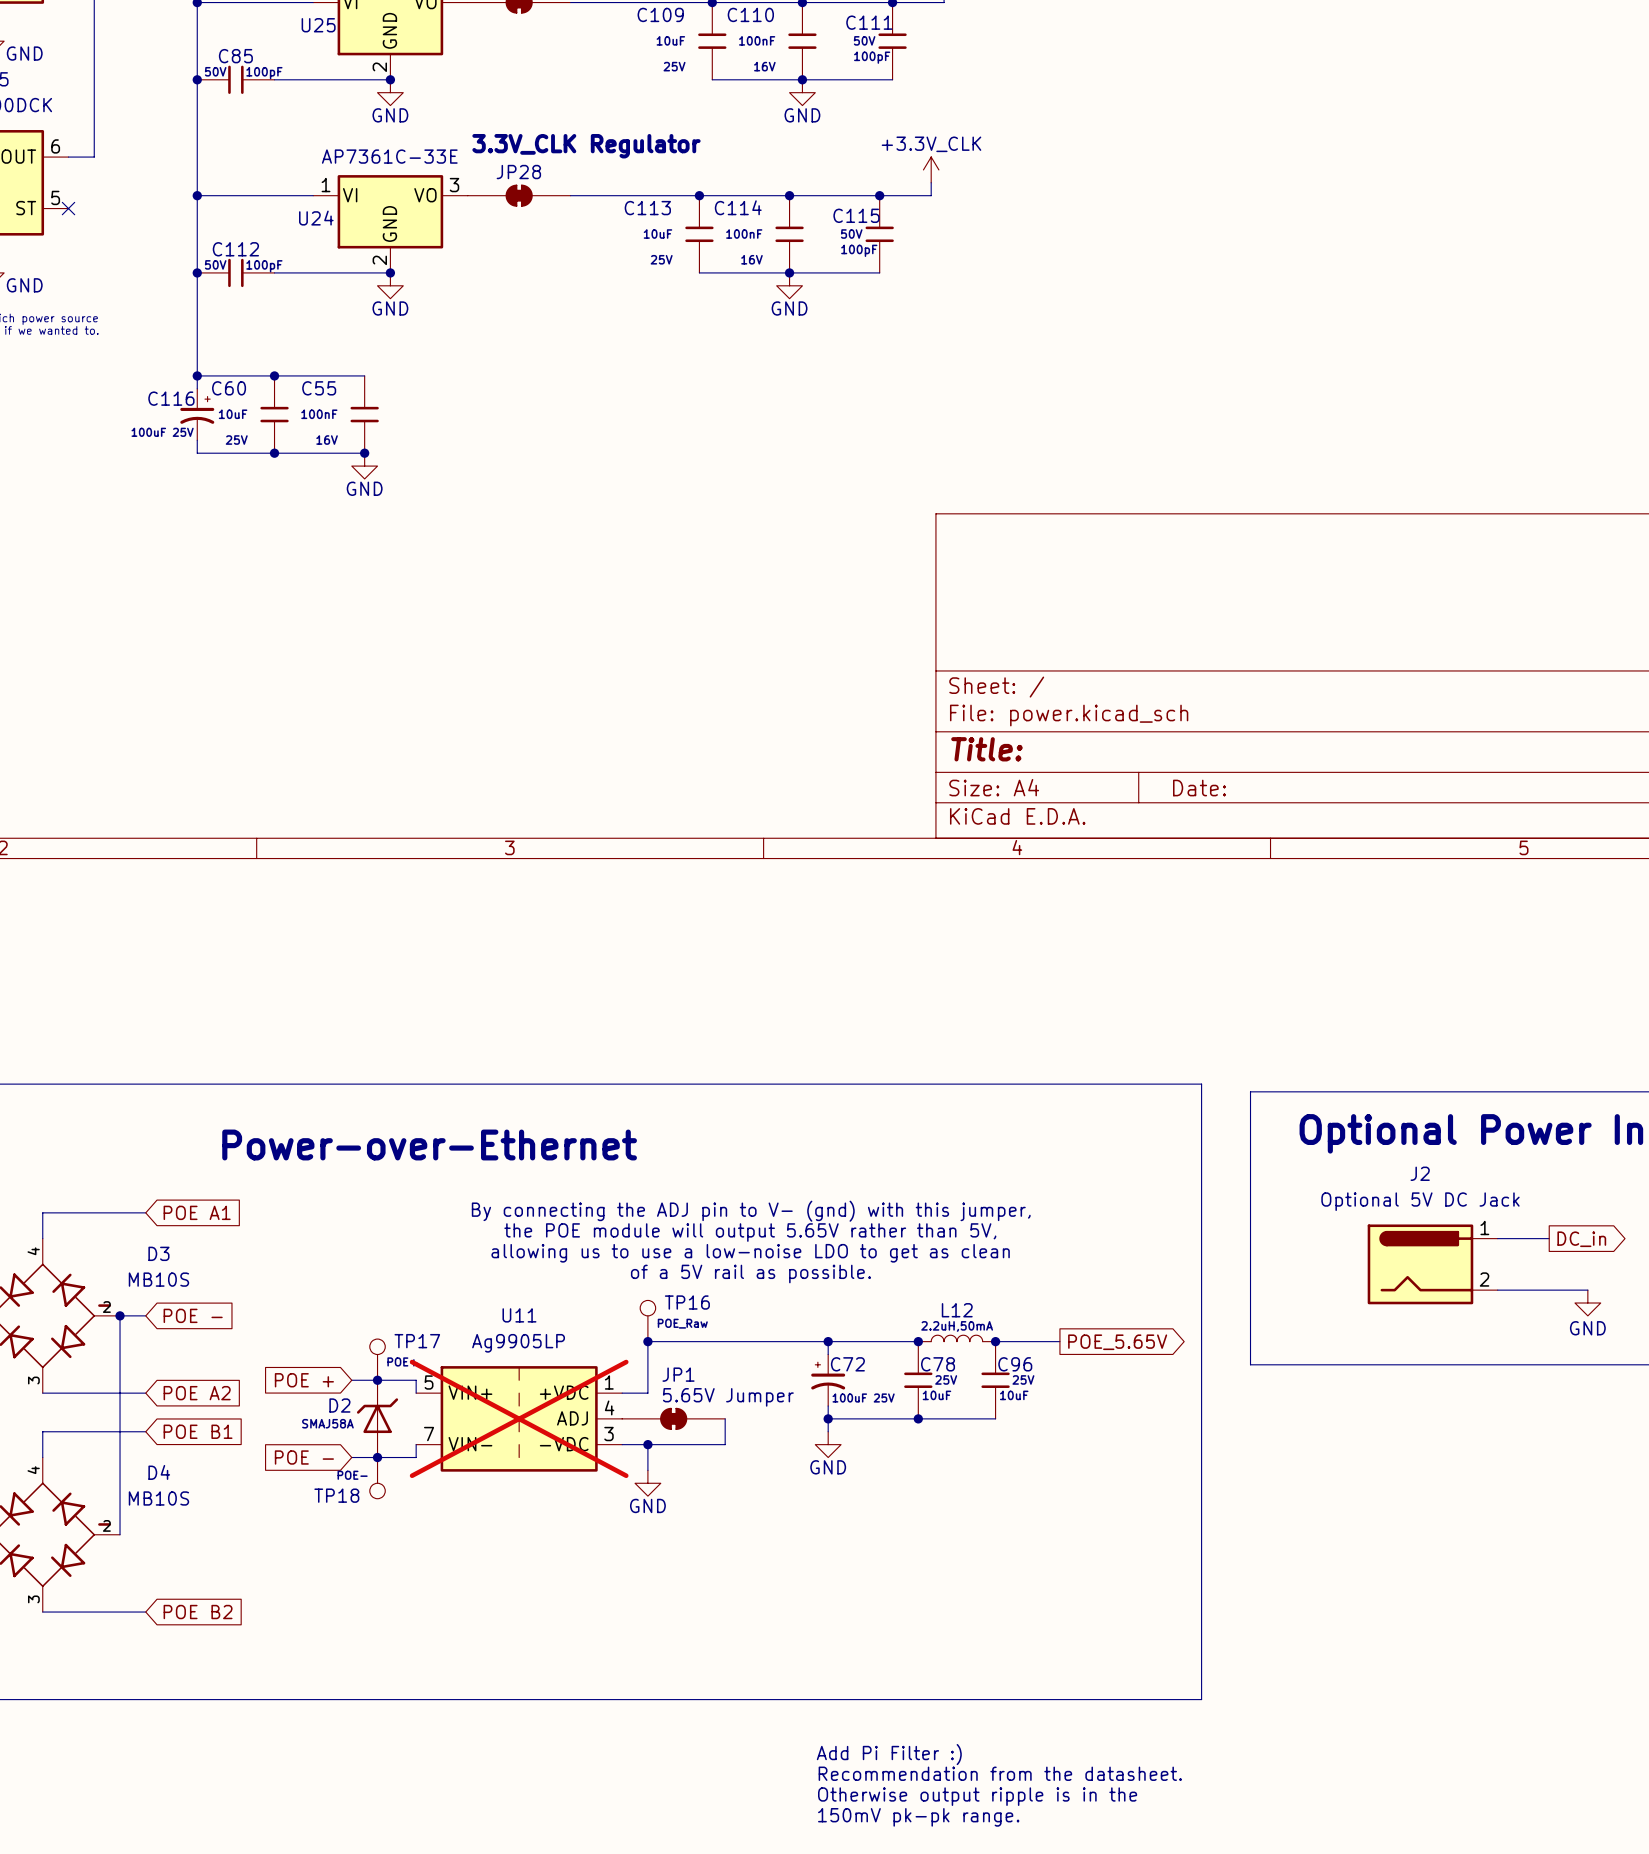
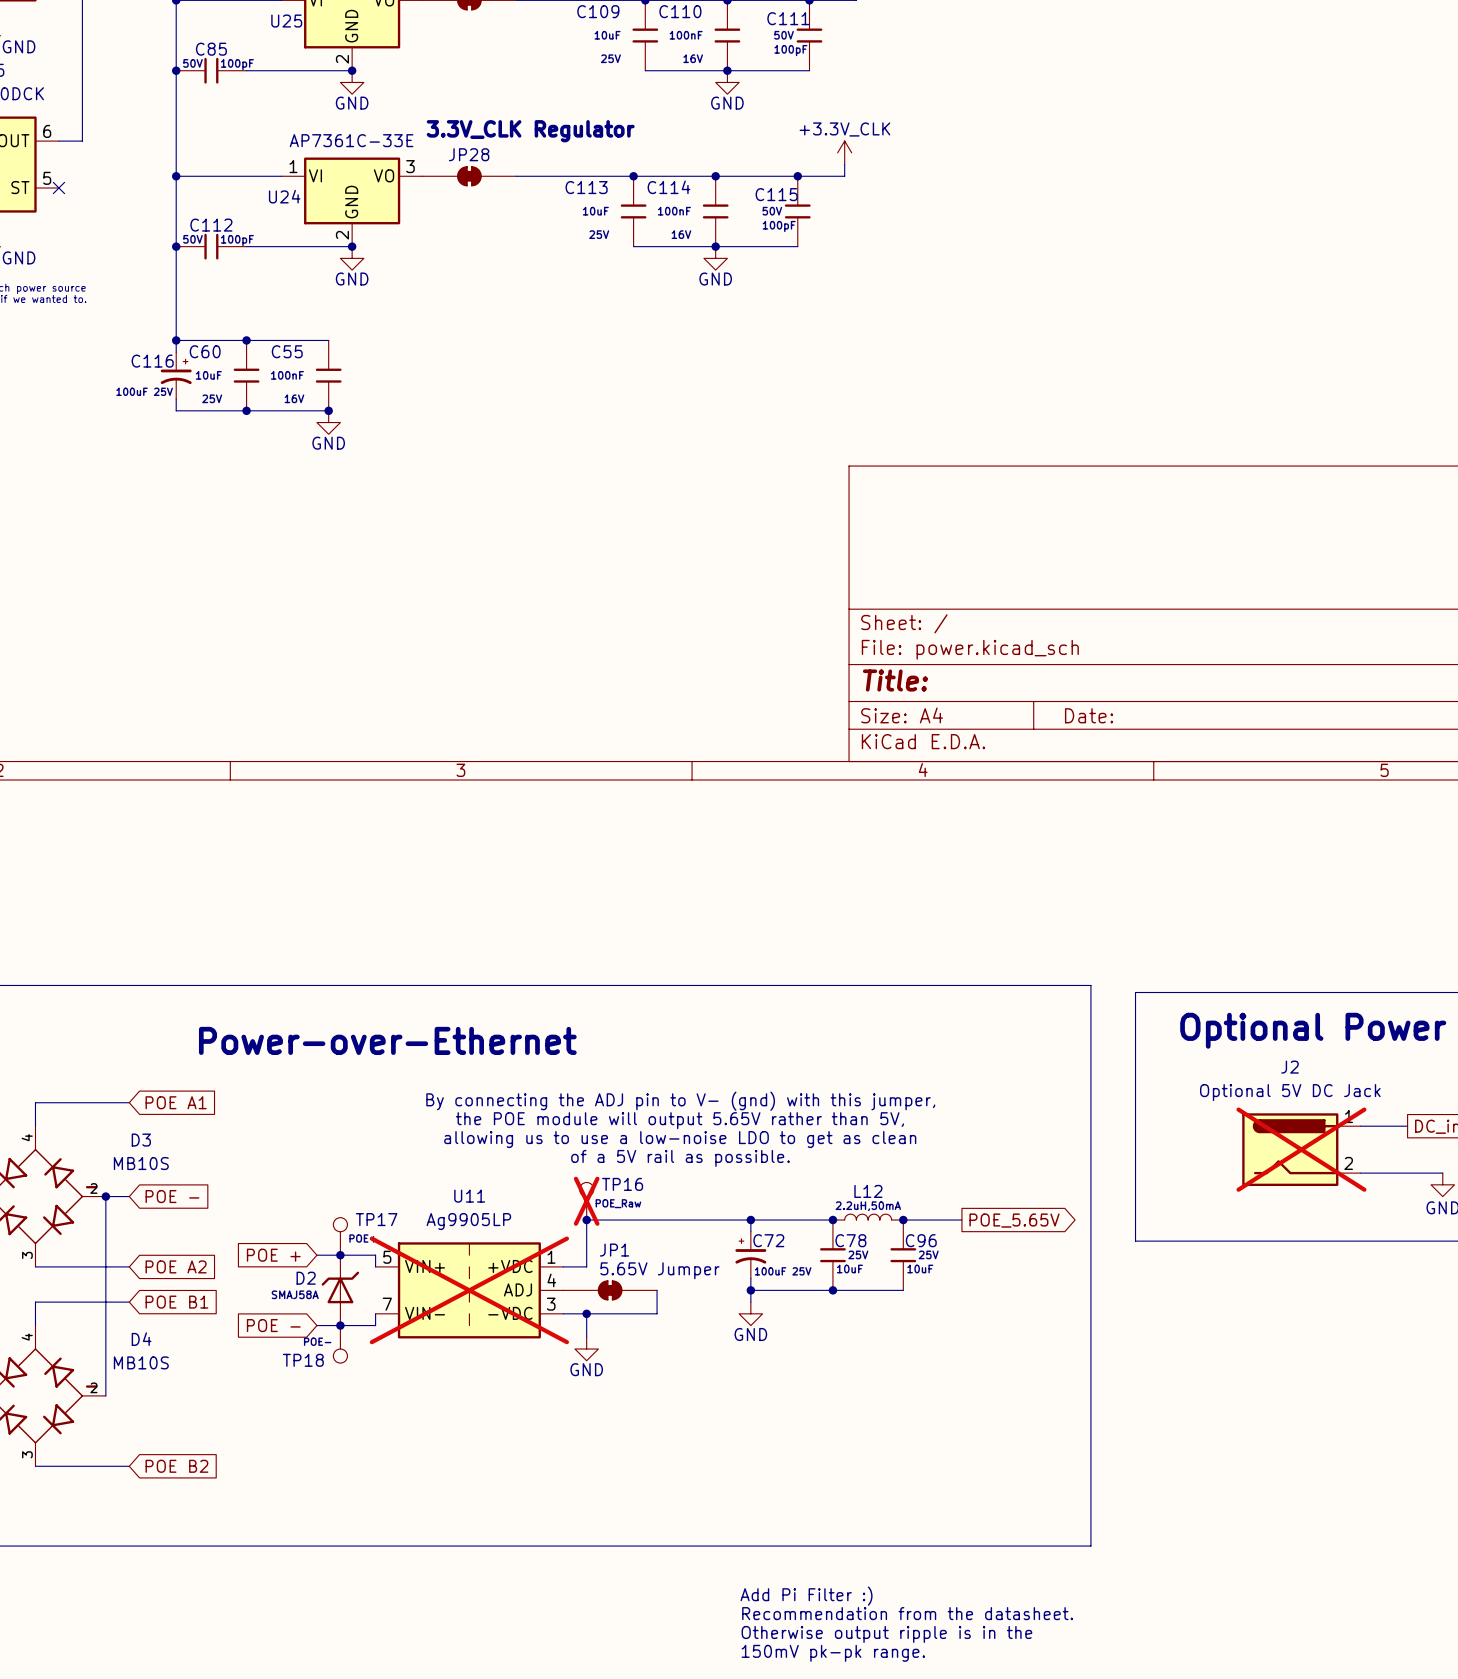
J2 do-not-place cross: none -> (1301, 1149)
TP16 do-not-place cross: none -> (586, 1201)

